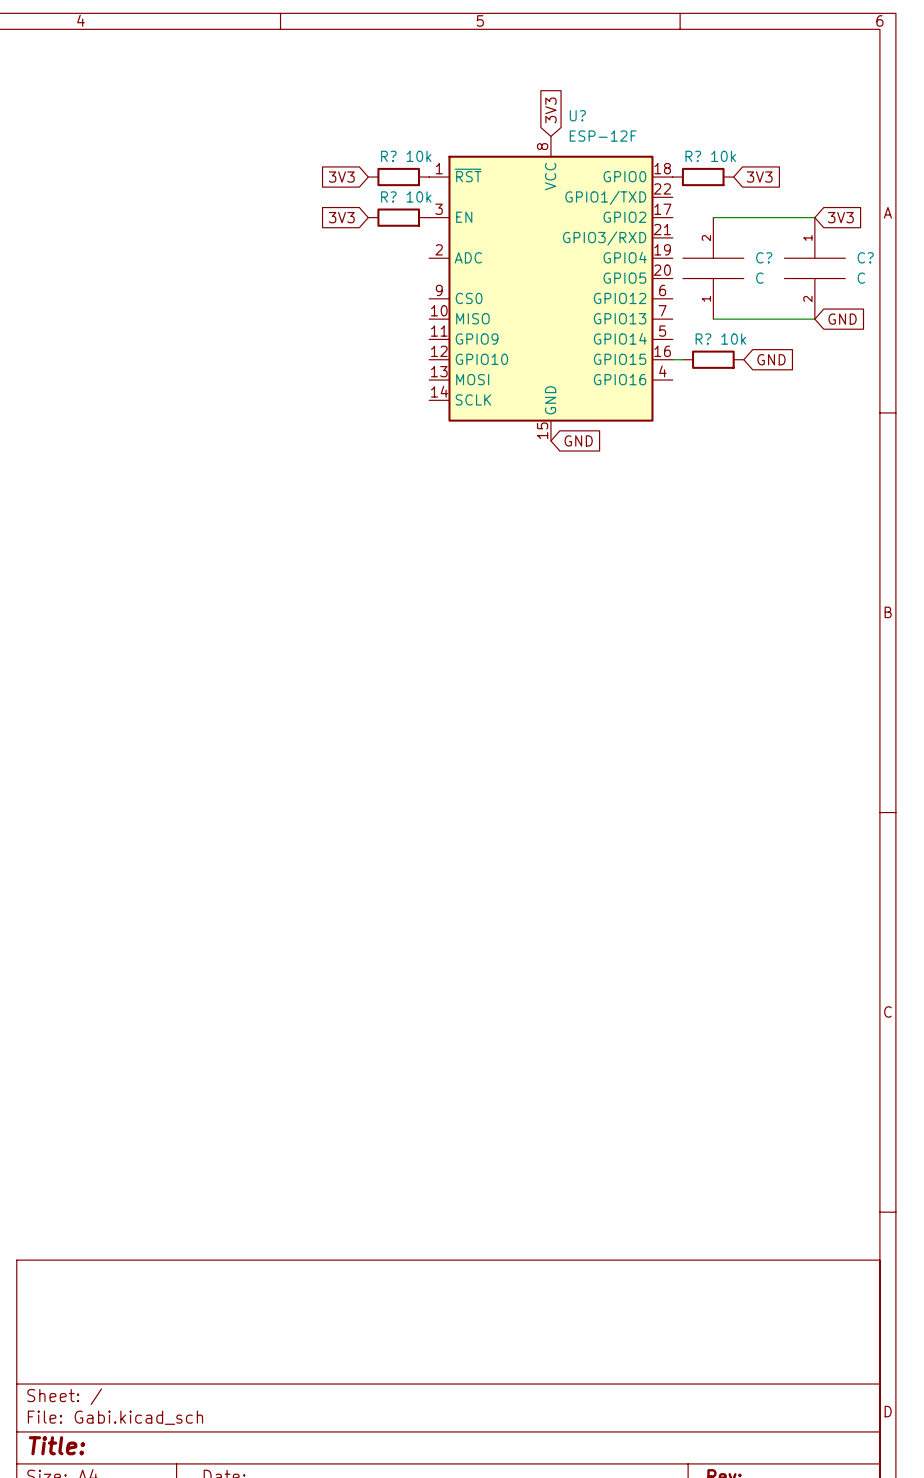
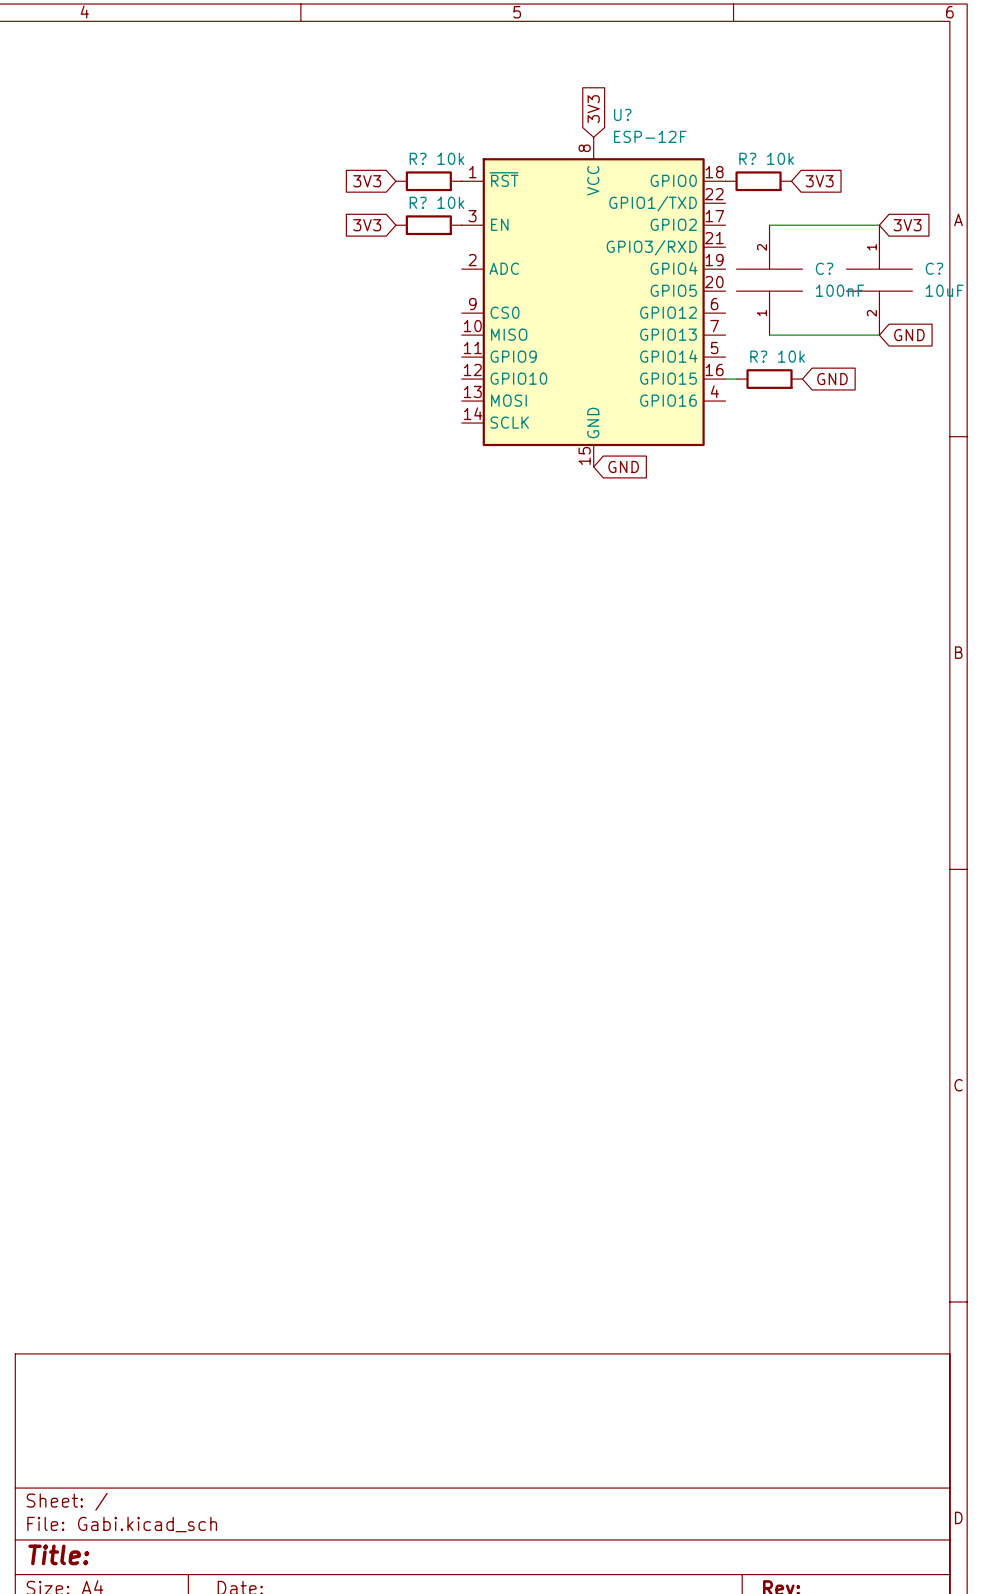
C? value: C (759, 278) -> 100nF (839, 290)
C? value: C (861, 278) -> 10uF (944, 290)

